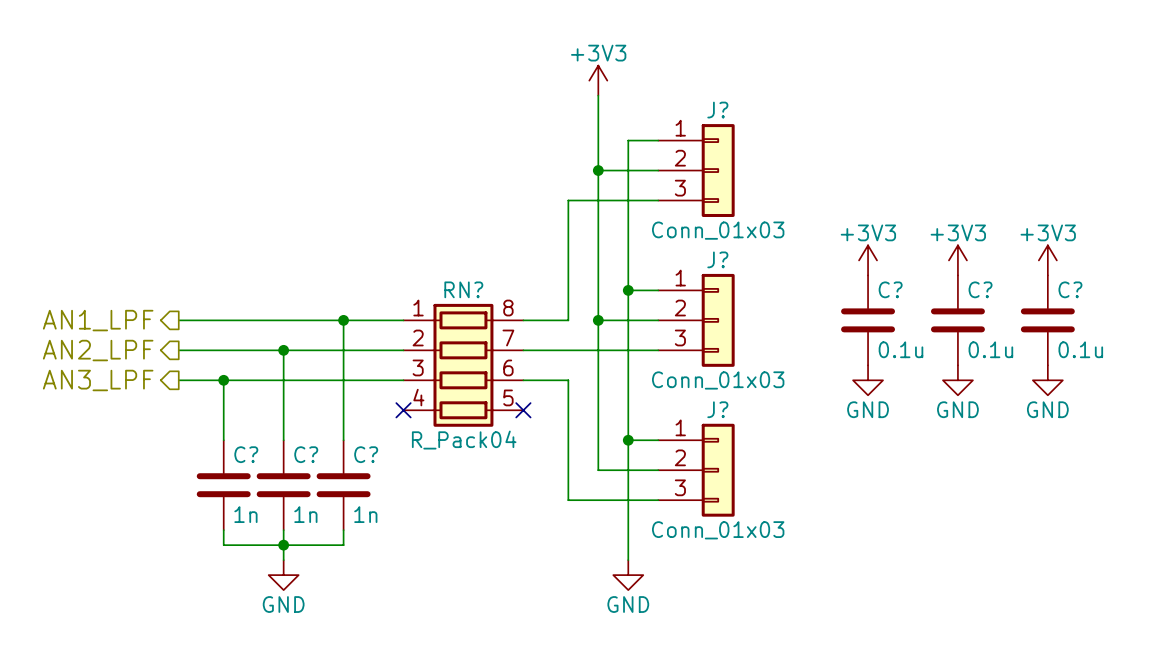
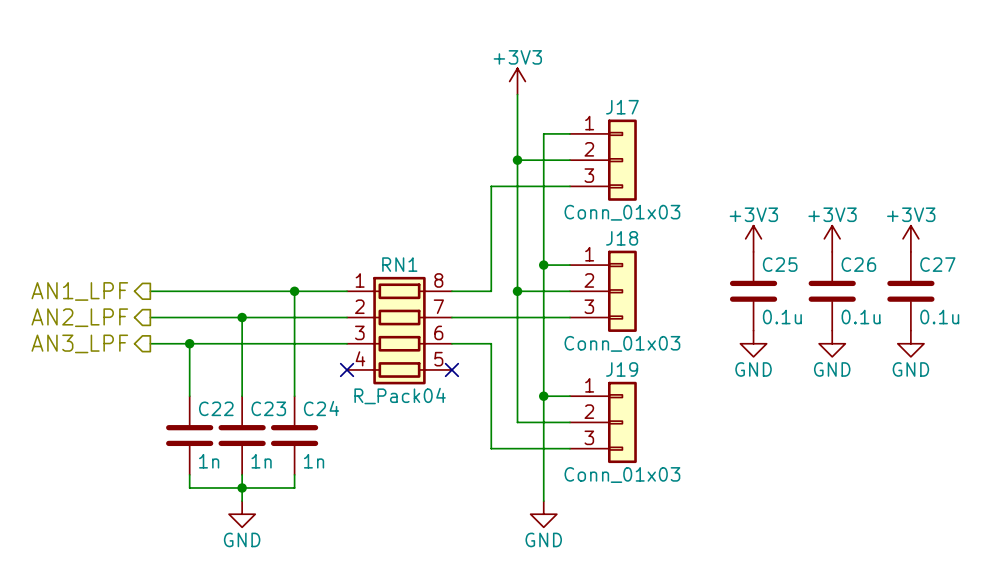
J? name: J? (717, 110) -> J17 (622, 107)
J? name: J? (717, 259) -> J18 (622, 238)
RN? name: RN? (463, 289) -> RN1 (399, 264)
C? name: C? (890, 289) -> C25 (780, 264)
C? name: C? (980, 289) -> C26 (858, 264)
C? name: C? (1070, 289) -> C27 (937, 264)
J? name: J? (717, 409) -> J19 (622, 369)
C? name: C? (246, 454) -> C22 (216, 408)
C? name: C? (306, 454) -> C23 (268, 408)
C? name: C? (366, 454) -> C24 (321, 408)

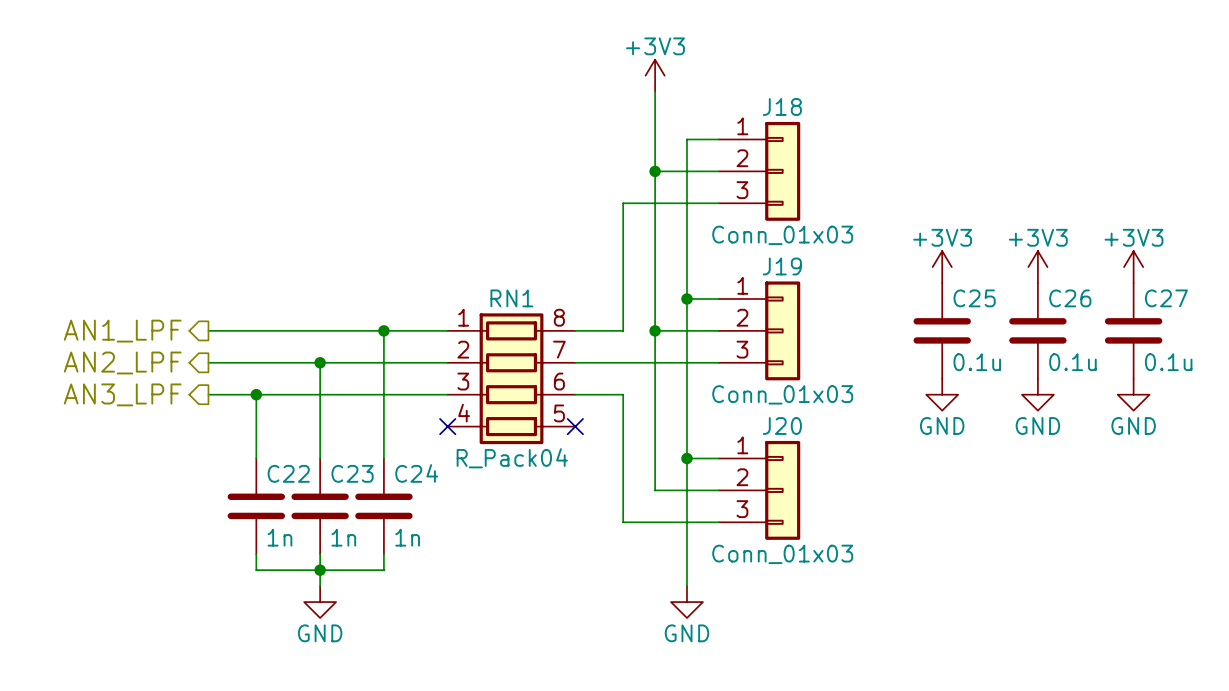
J17 name: J17 (622, 107) -> J18 (782, 106)
J18 name: J18 (622, 238) -> J19 (782, 266)
J19 name: J19 (622, 369) -> J20 (782, 426)

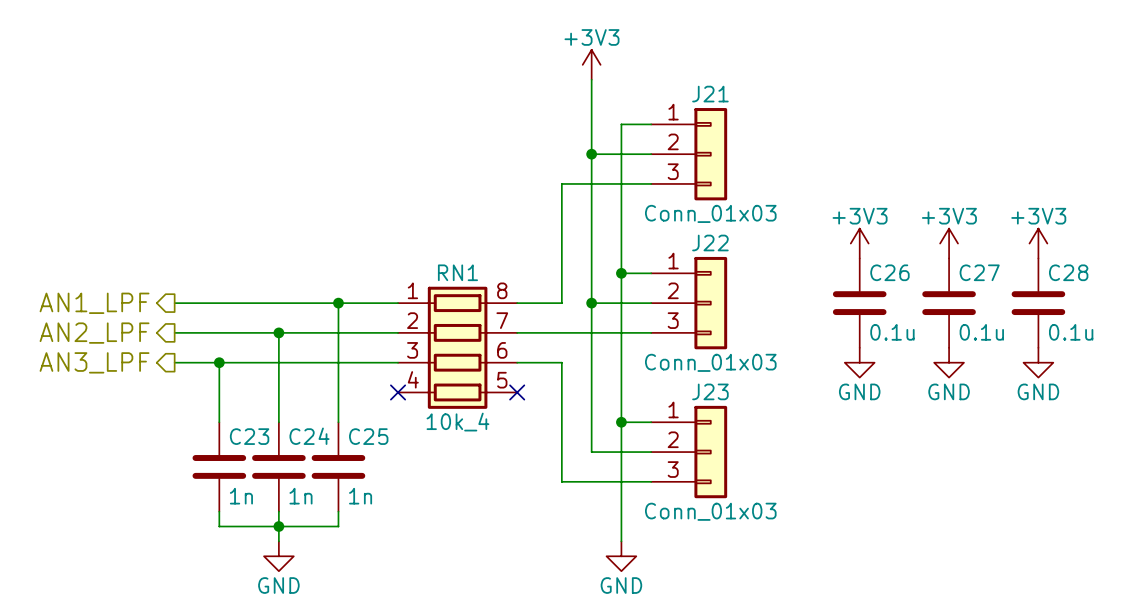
J18 name: J18 (782, 106) -> J21 (710, 94)
J19 name: J19 (782, 266) -> J22 (710, 242)
C25 name: C25 (974, 298) -> C26 (889, 272)
C26 name: C26 (1070, 298) -> C27 (979, 272)
C27 name: C27 (1166, 298) -> C28 (1068, 272)
J20 name: J20 (782, 426) -> J23 (710, 391)
RN1 value: R_Pack04 (512, 458) -> 10k_4 (457, 422)
C22 name: C22 (288, 473) -> C23 (249, 436)
C23 name: C23 (352, 473) -> C24 (309, 436)
C24 name: C24 (416, 473) -> C25 (368, 436)

